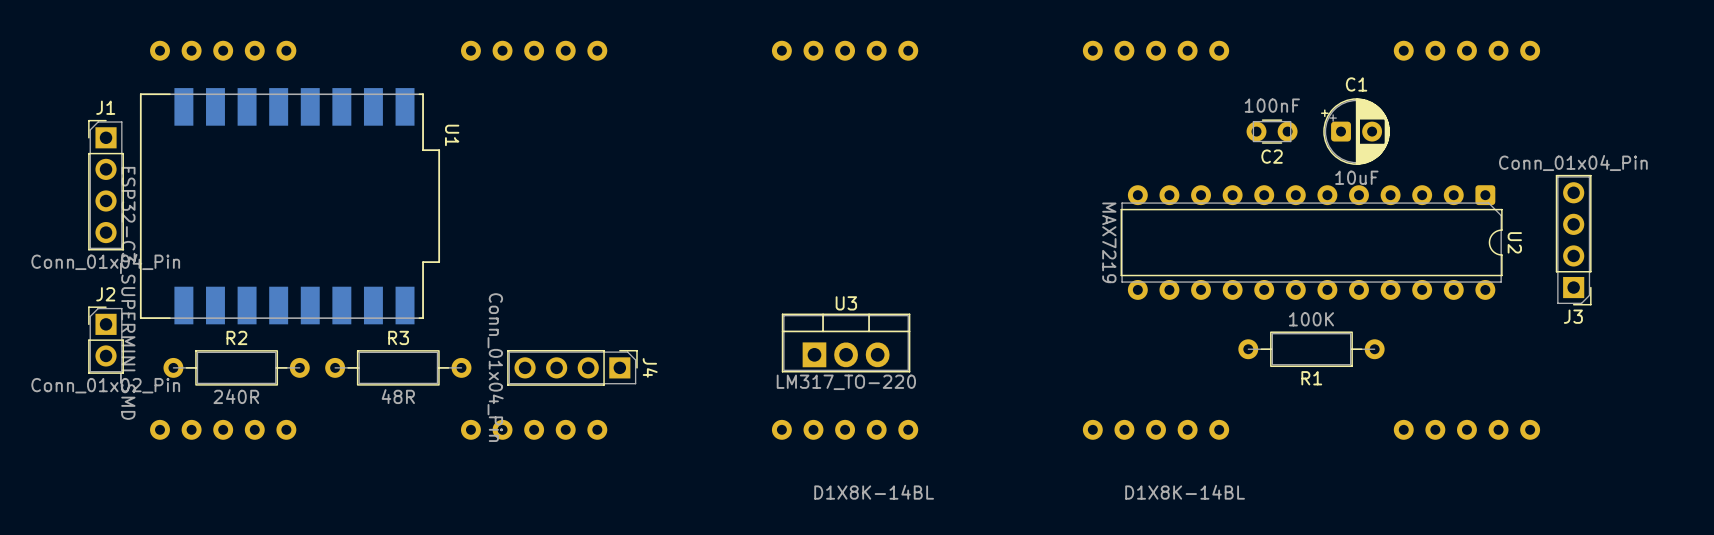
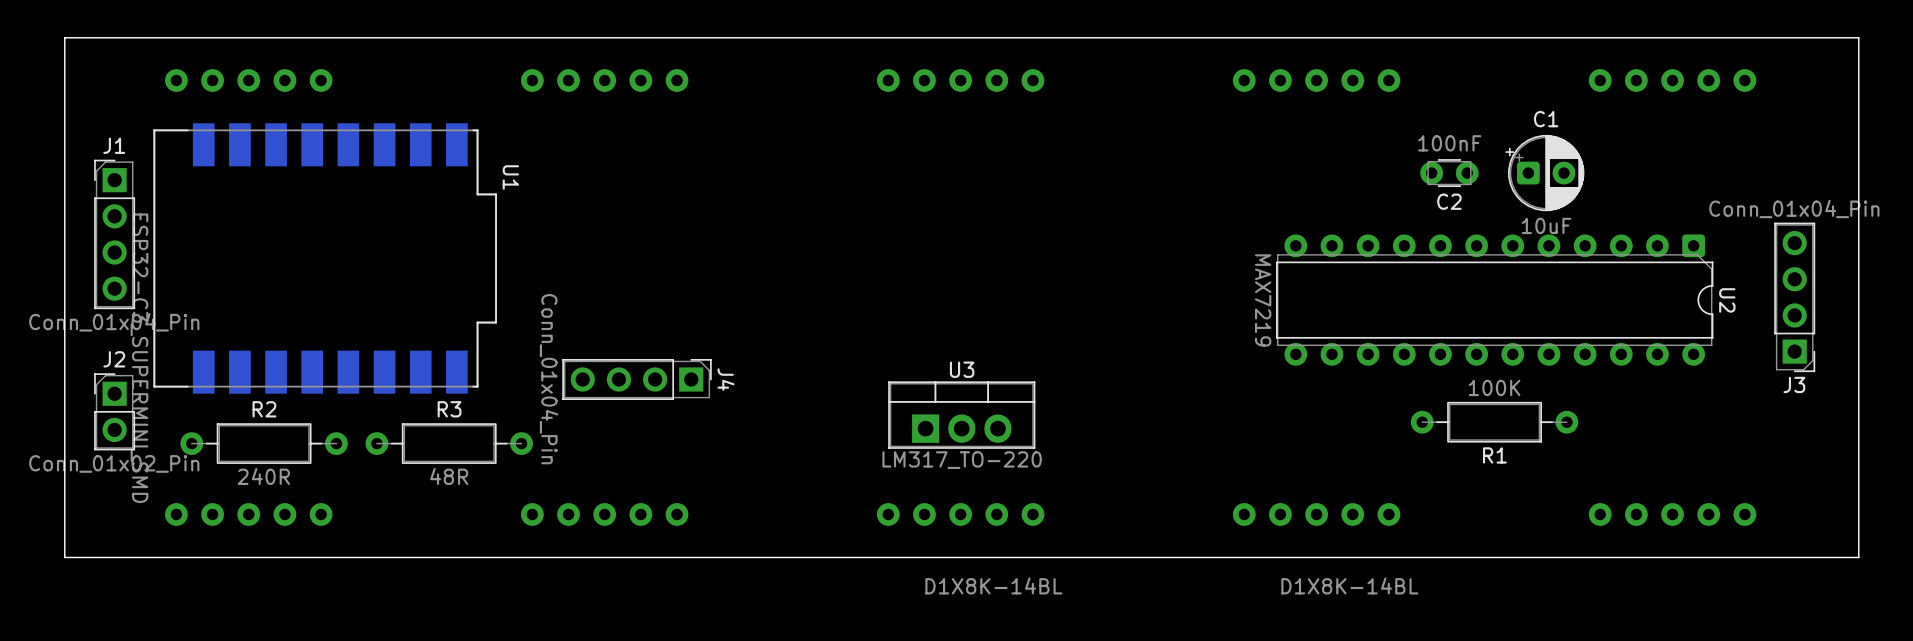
board edge: none -> (1858, 37) (64, 37) (64, 557) (1858, 557) (1858, 37)
J4 position: (572, 367) -> (637, 379)

